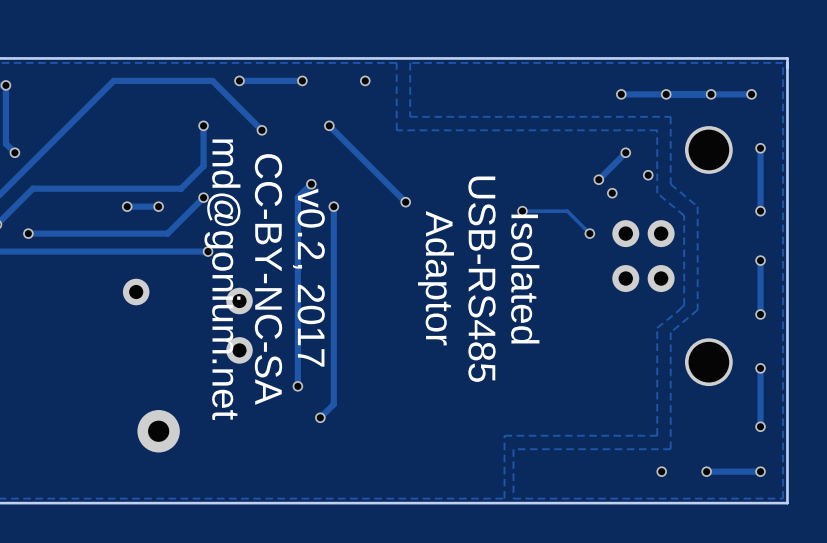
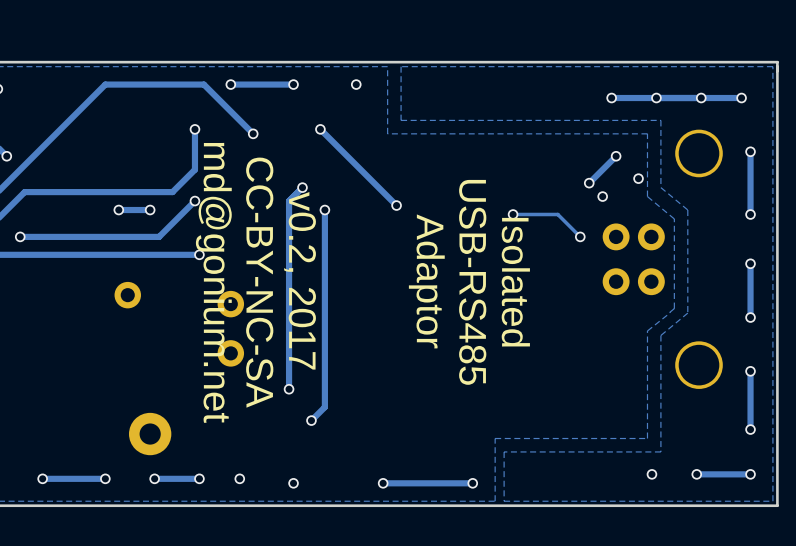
via: none -> (42, 478)
track: none -> (105, 478) (42, 478)
via: none -> (105, 478)
via: none -> (154, 478)
track: none -> (199, 478) (154, 478)
via: none -> (199, 478)
via: none -> (239, 478)
via: none -> (293, 483)
via: none -> (383, 483)
track: none -> (472, 483) (383, 483)
via: none -> (472, 483)

